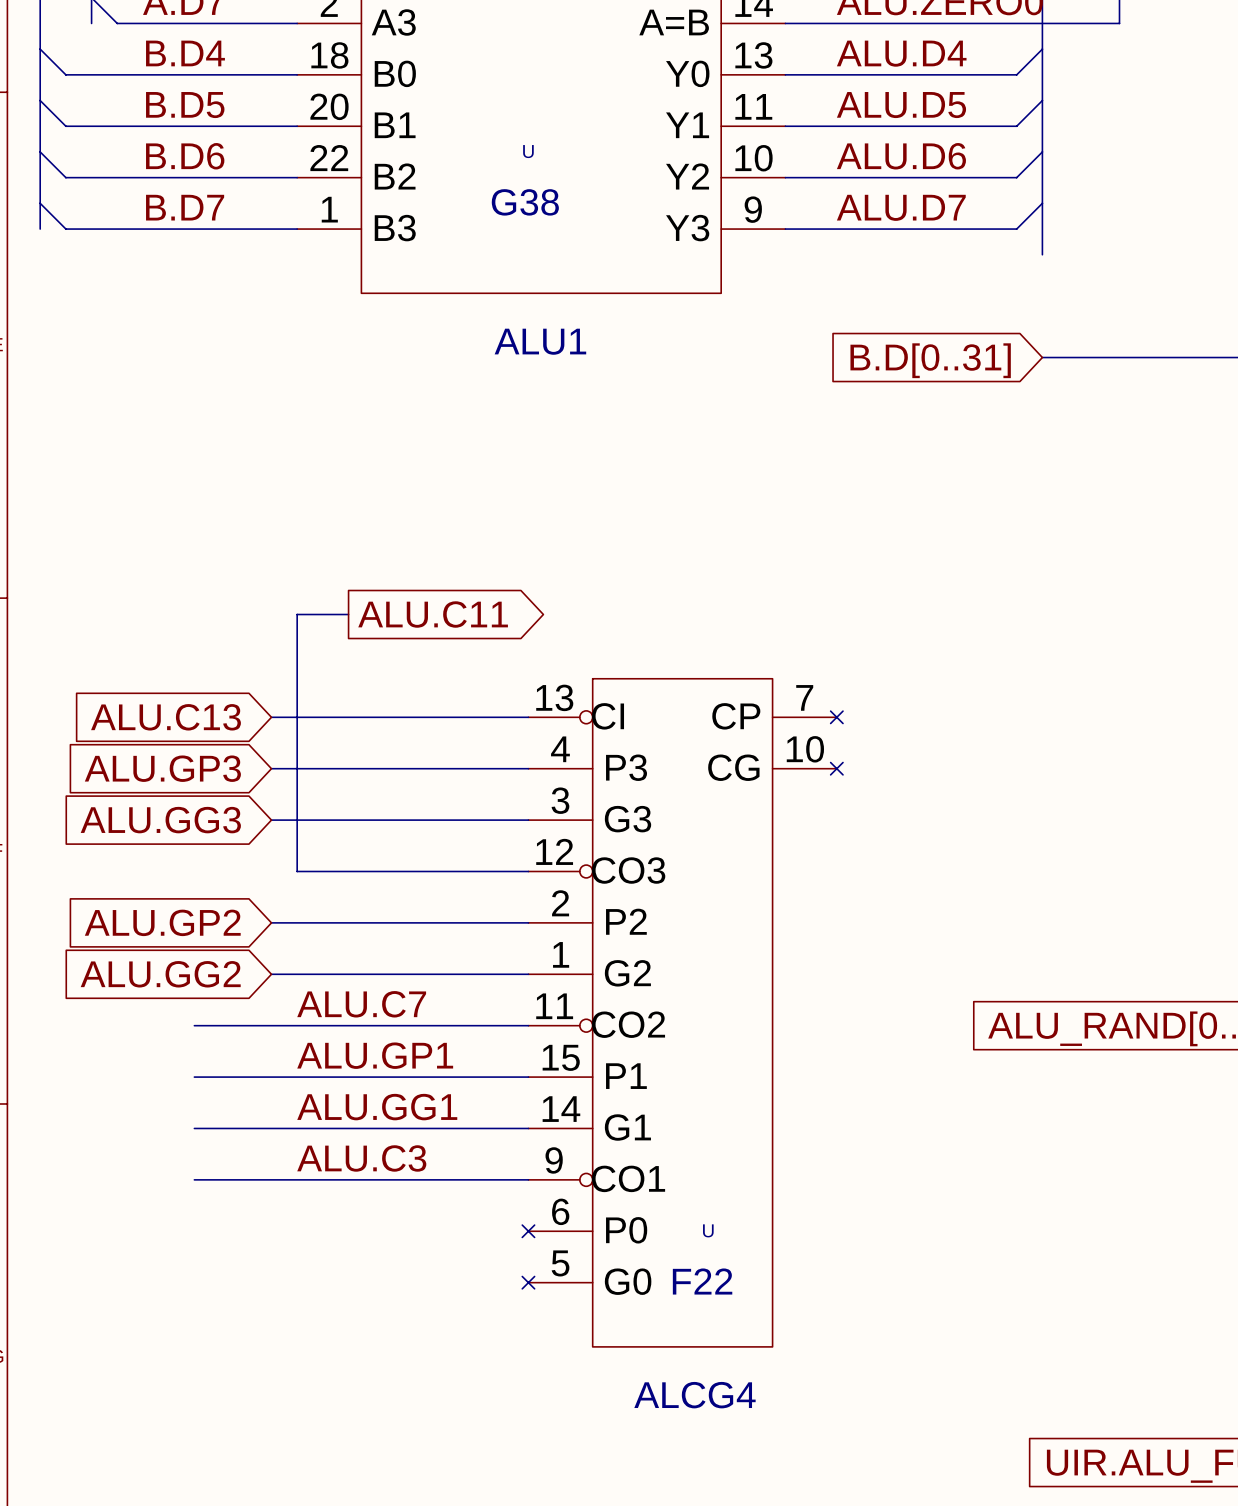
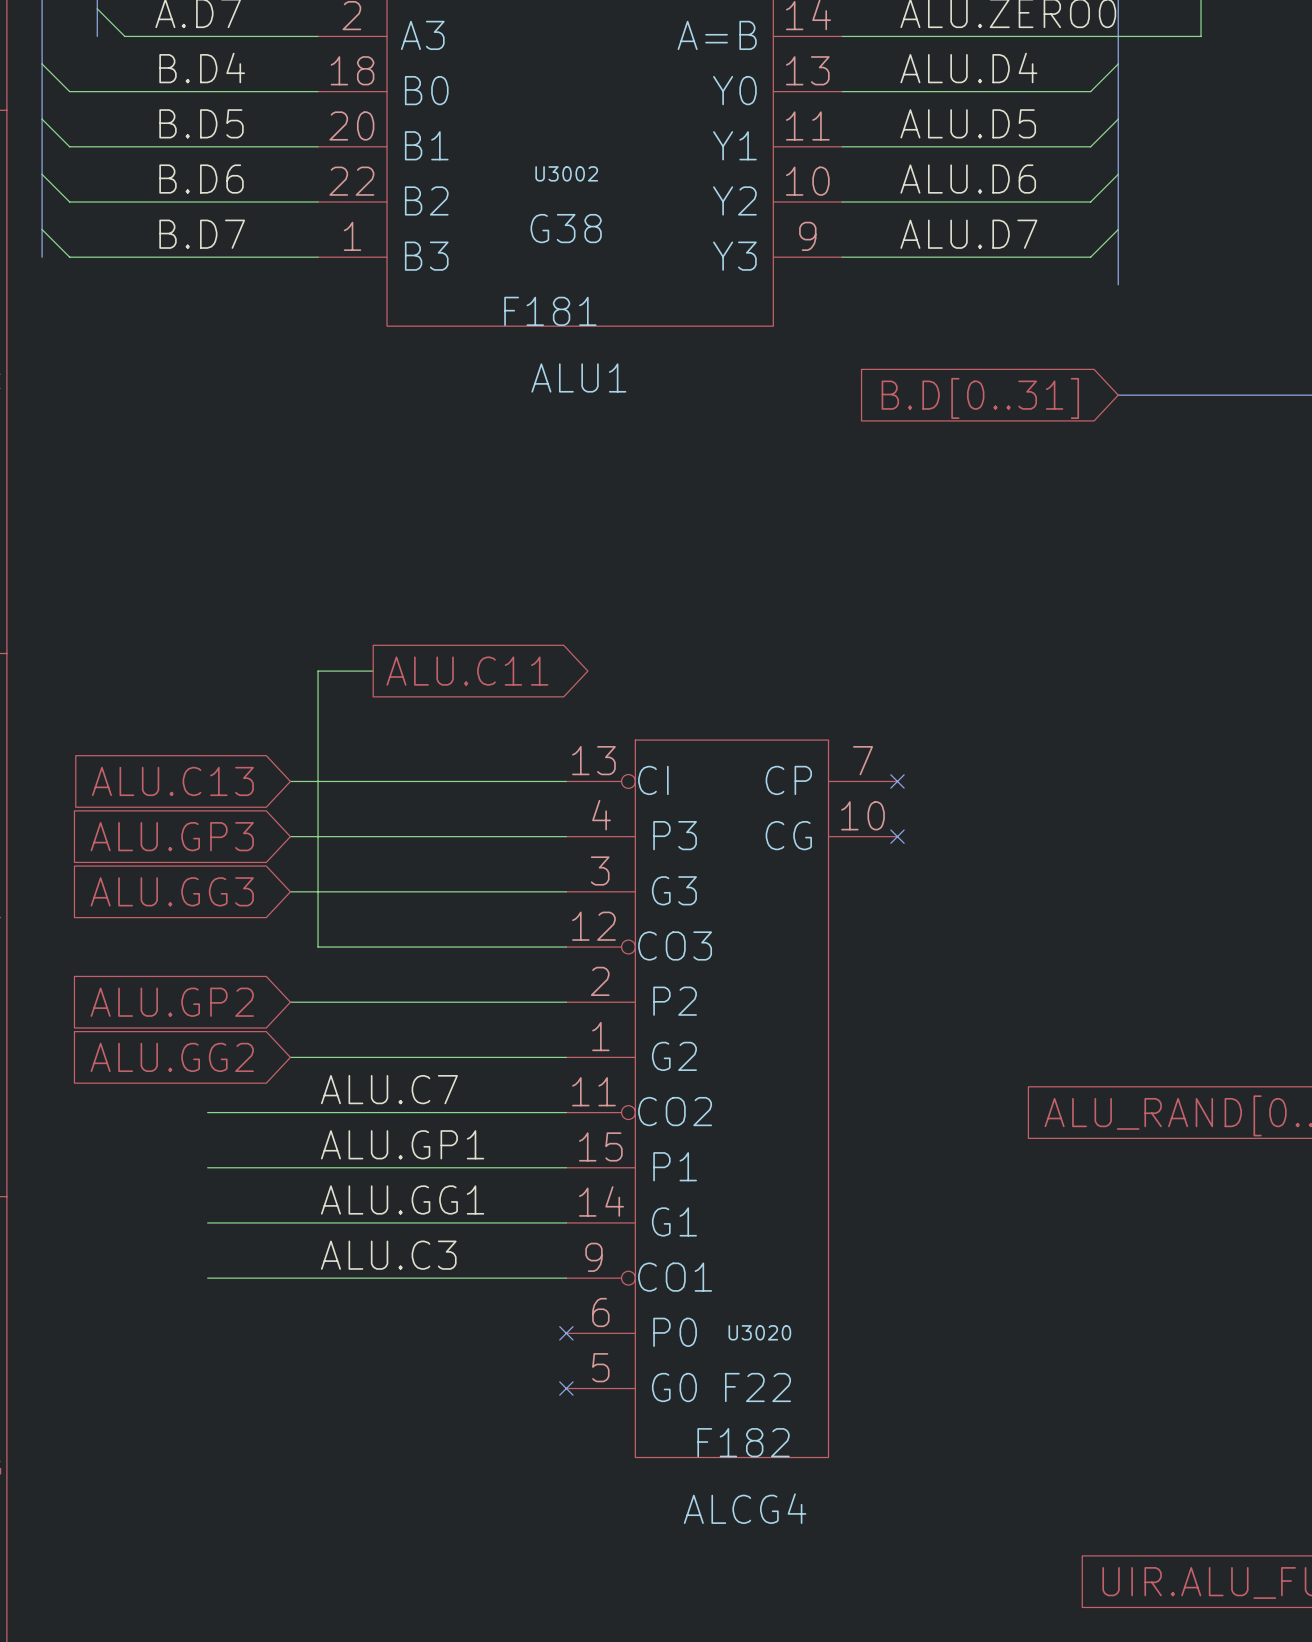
U name: U (528, 151) -> U3002 (566, 173)
U value: none -> F181 (550, 311)
U name: U (708, 1230) -> U3020 (759, 1332)
U value: none -> F182 (743, 1442)

